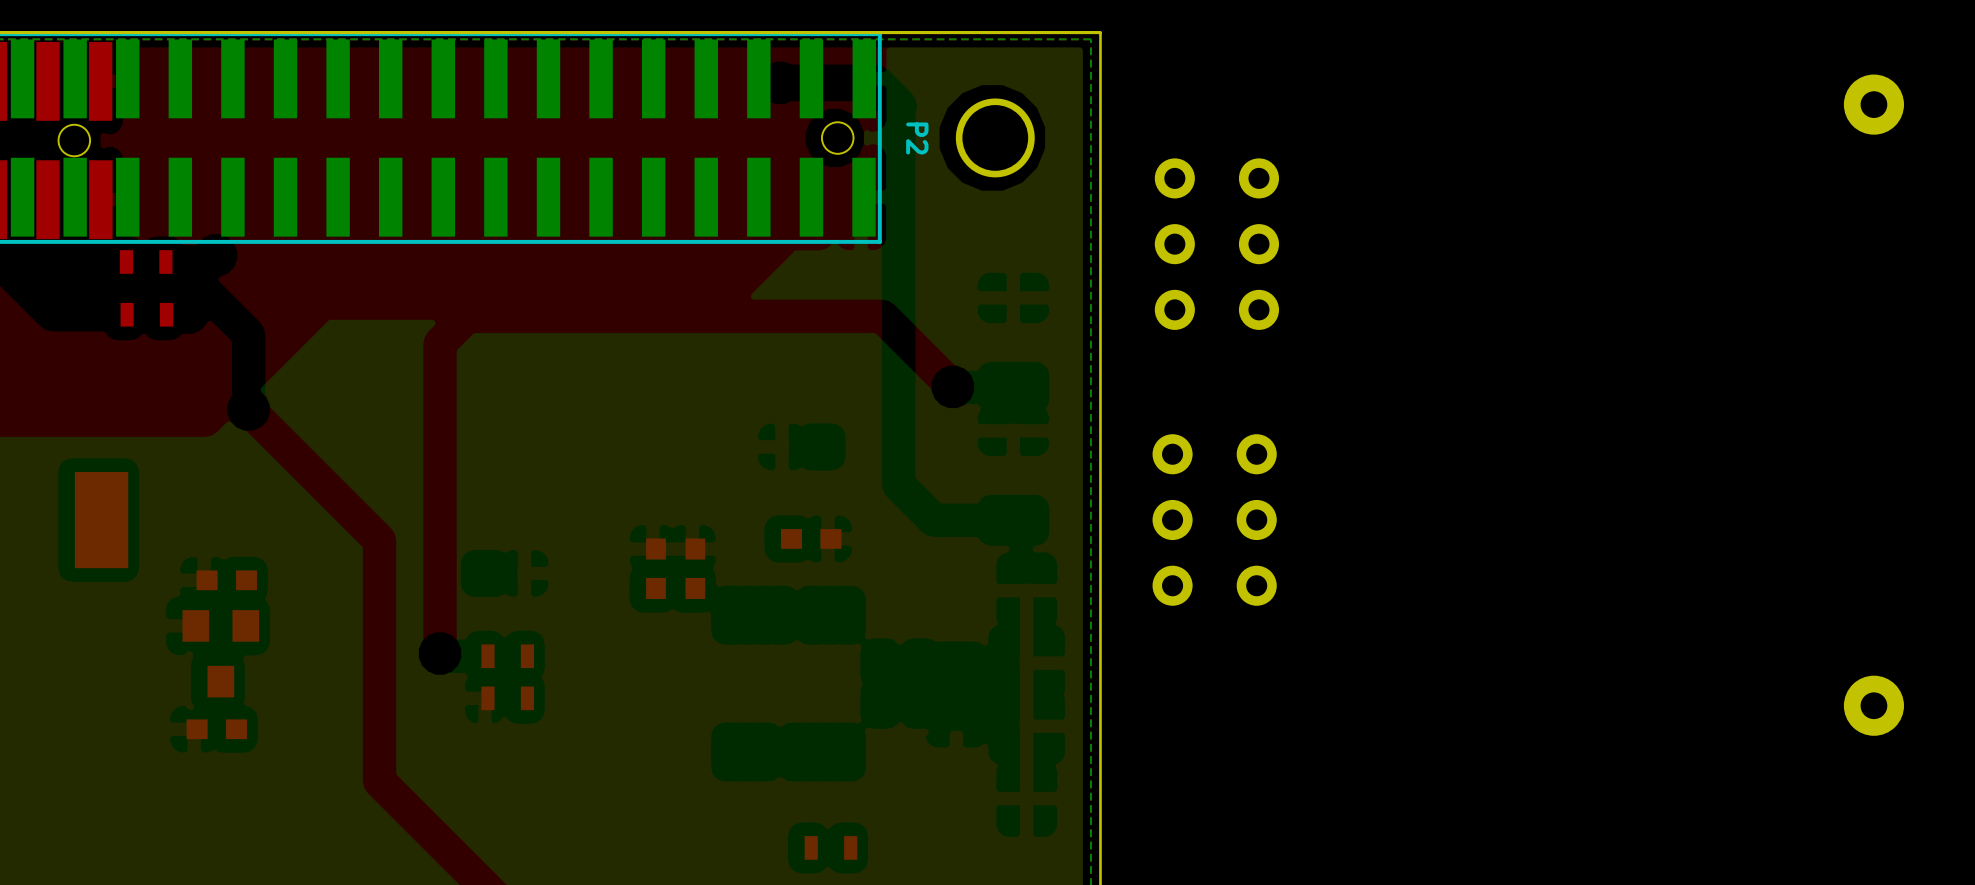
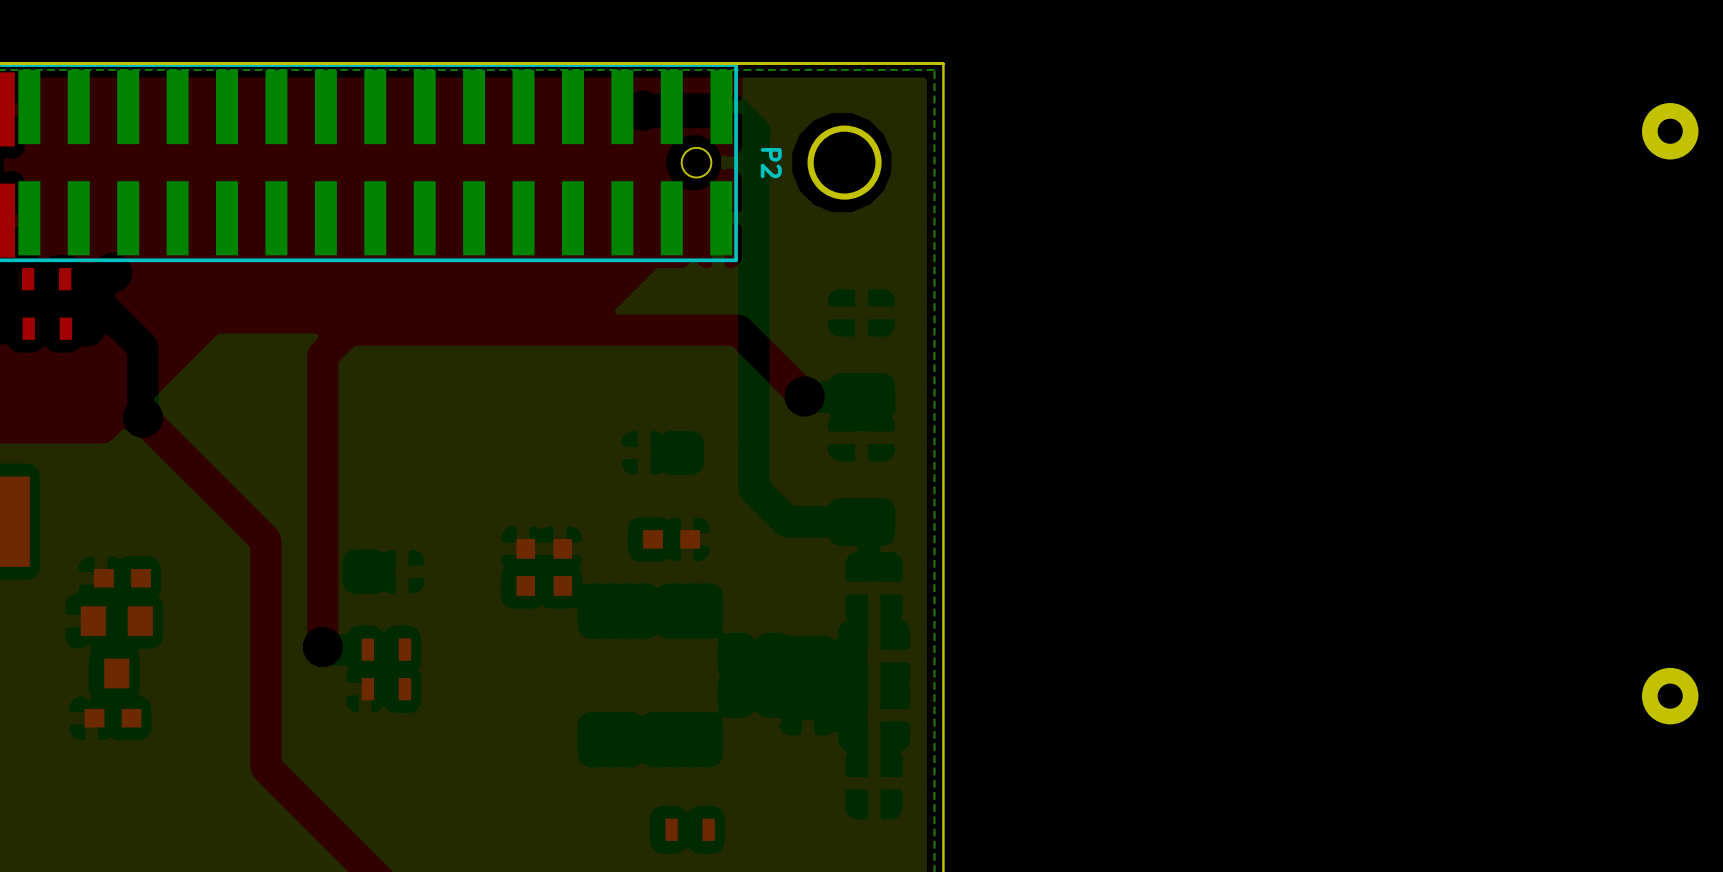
part: (1216, 244) -> none
part: (1214, 519) -> none

